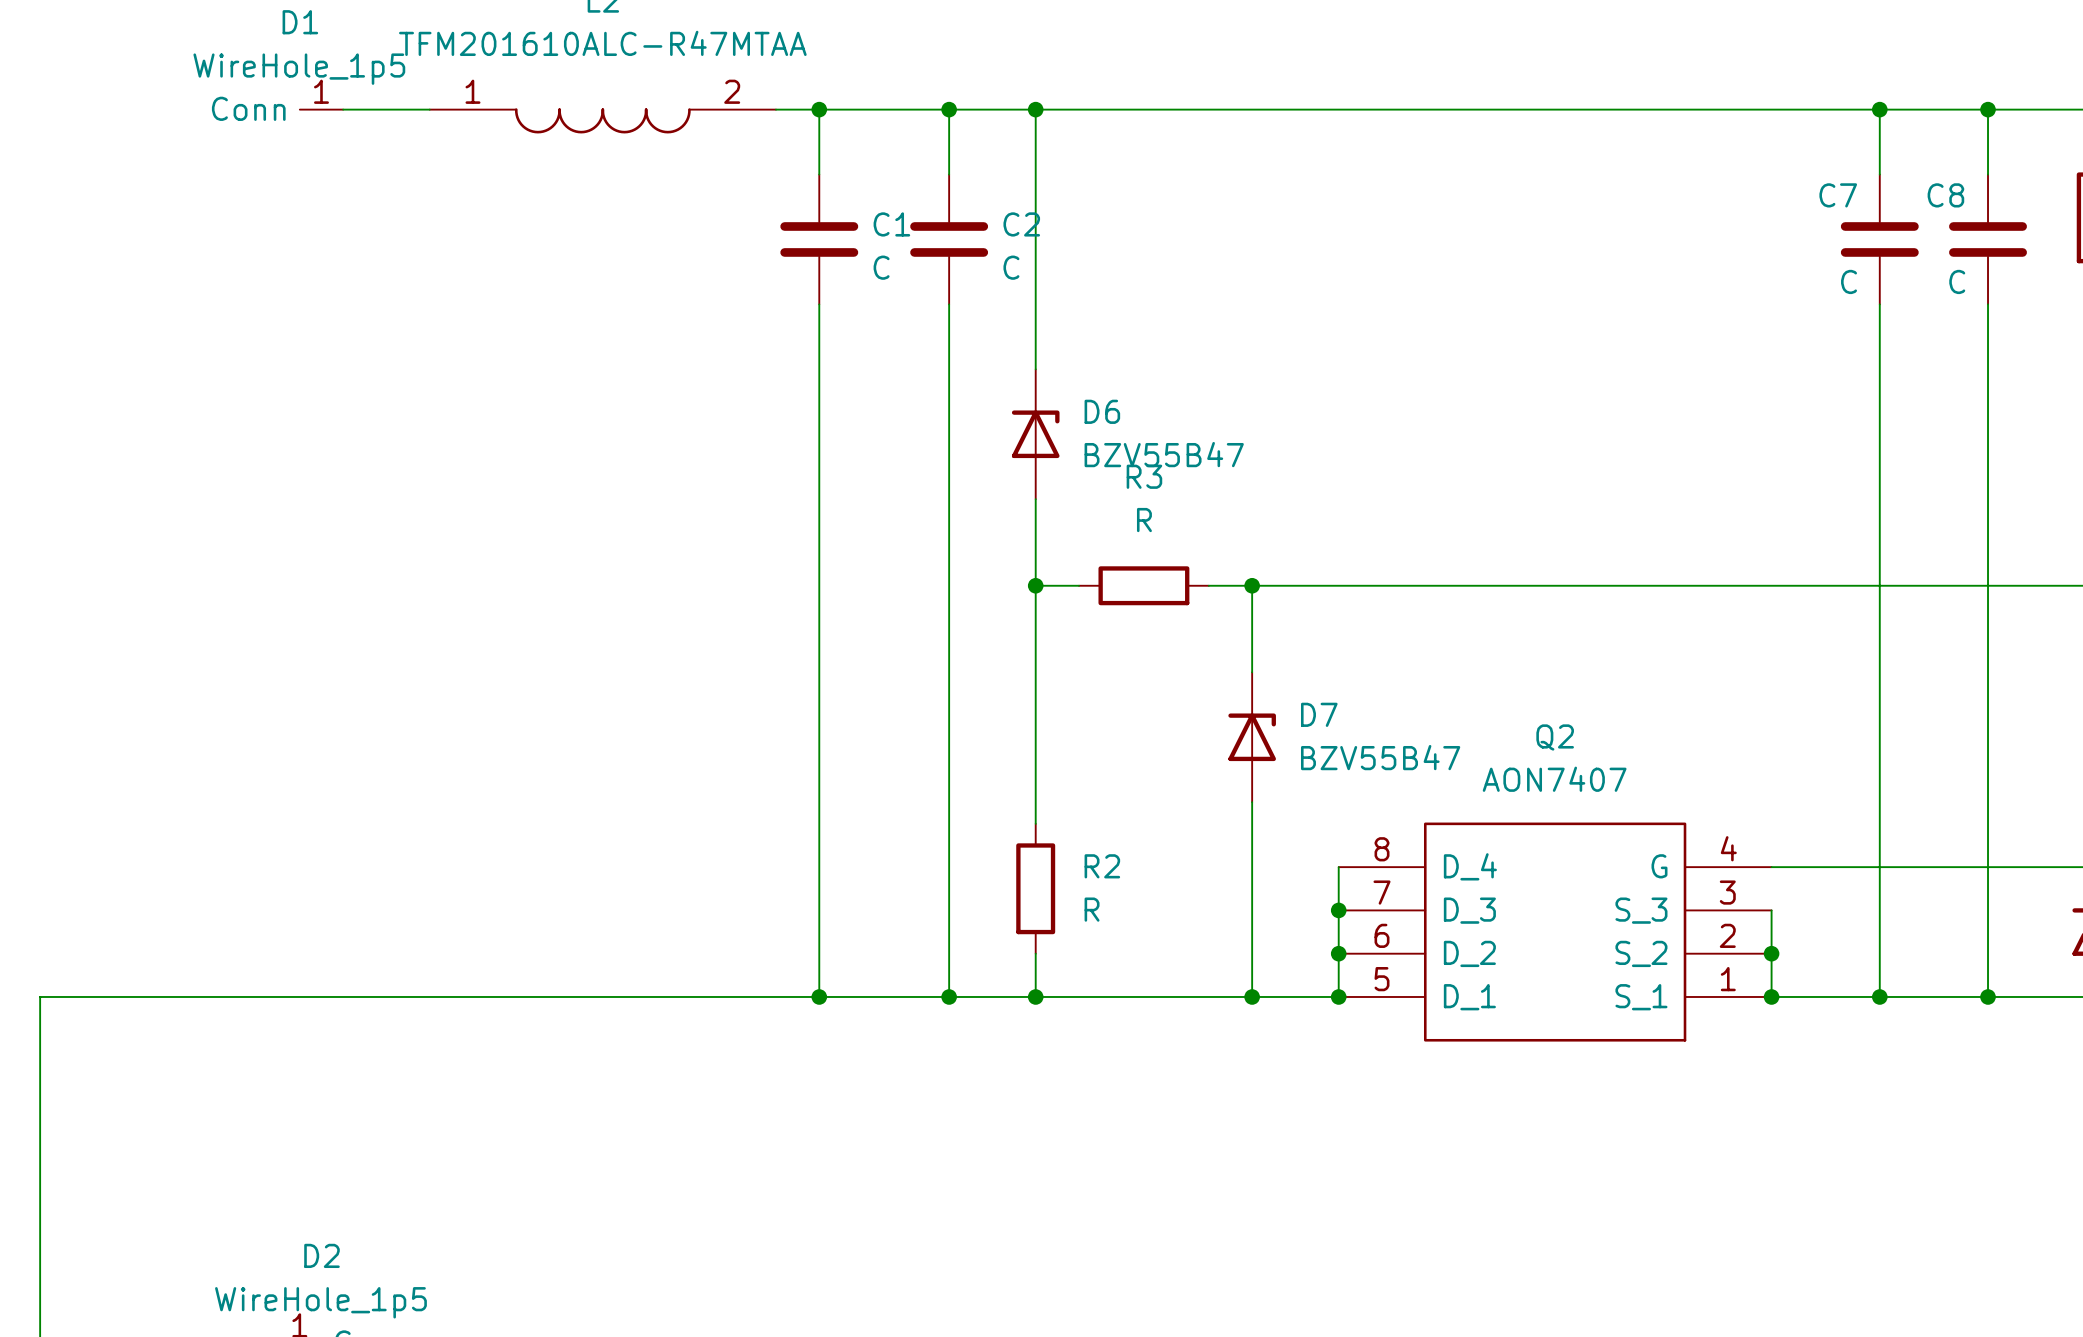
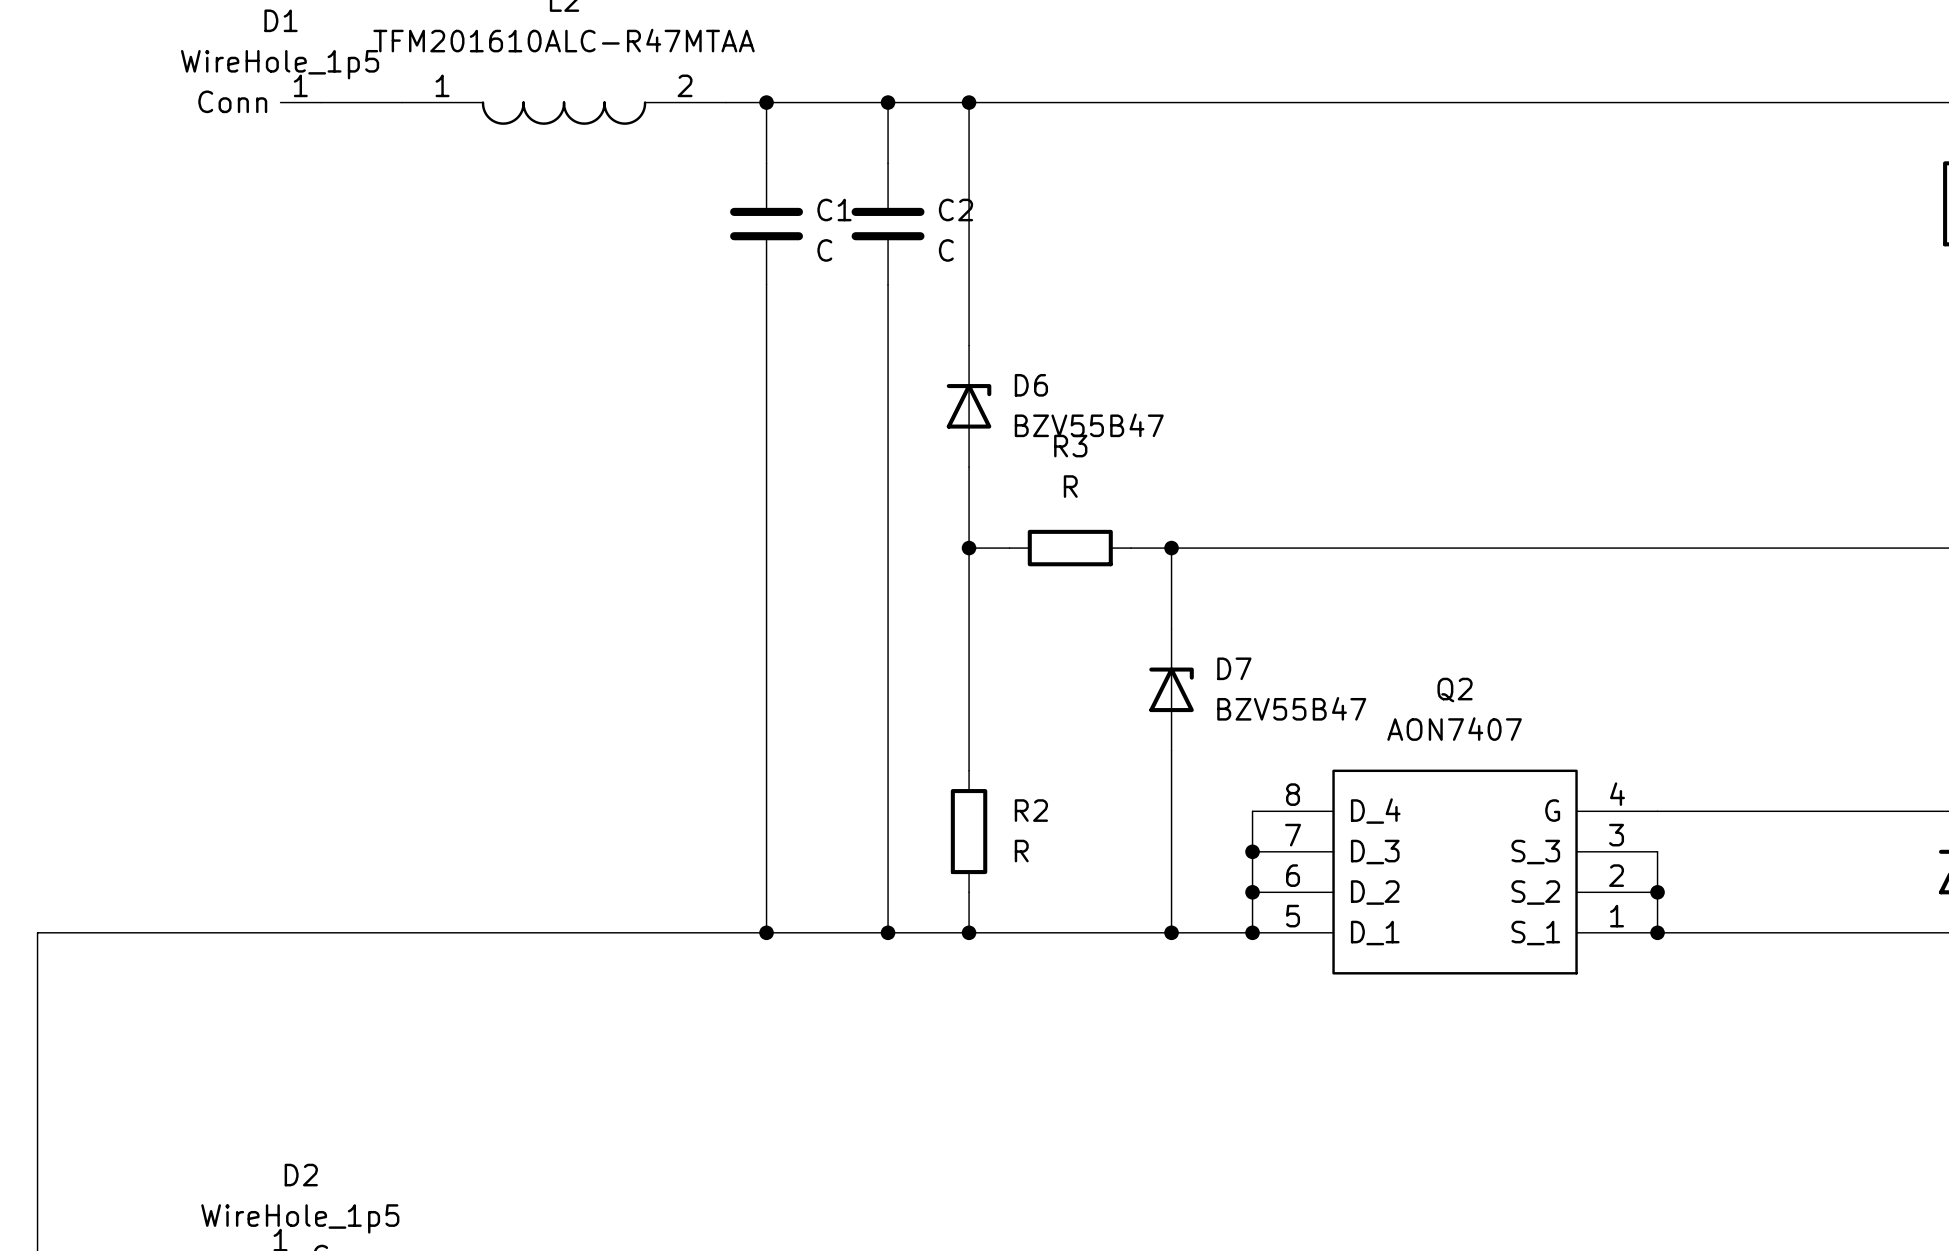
wire: (1879, 109) (1879, 174) -> none
junction: (1879, 109) -> none
wire: (1988, 109) (1988, 174) -> none
junction: (1988, 109) -> none
C7: C (1879, 239) -> none
C8: C (1988, 239) -> none
wire: (1879, 304) (1879, 996) -> none
wire: (1988, 304) (1988, 996) -> none
junction: (1879, 996) -> none
junction: (1988, 996) -> none

